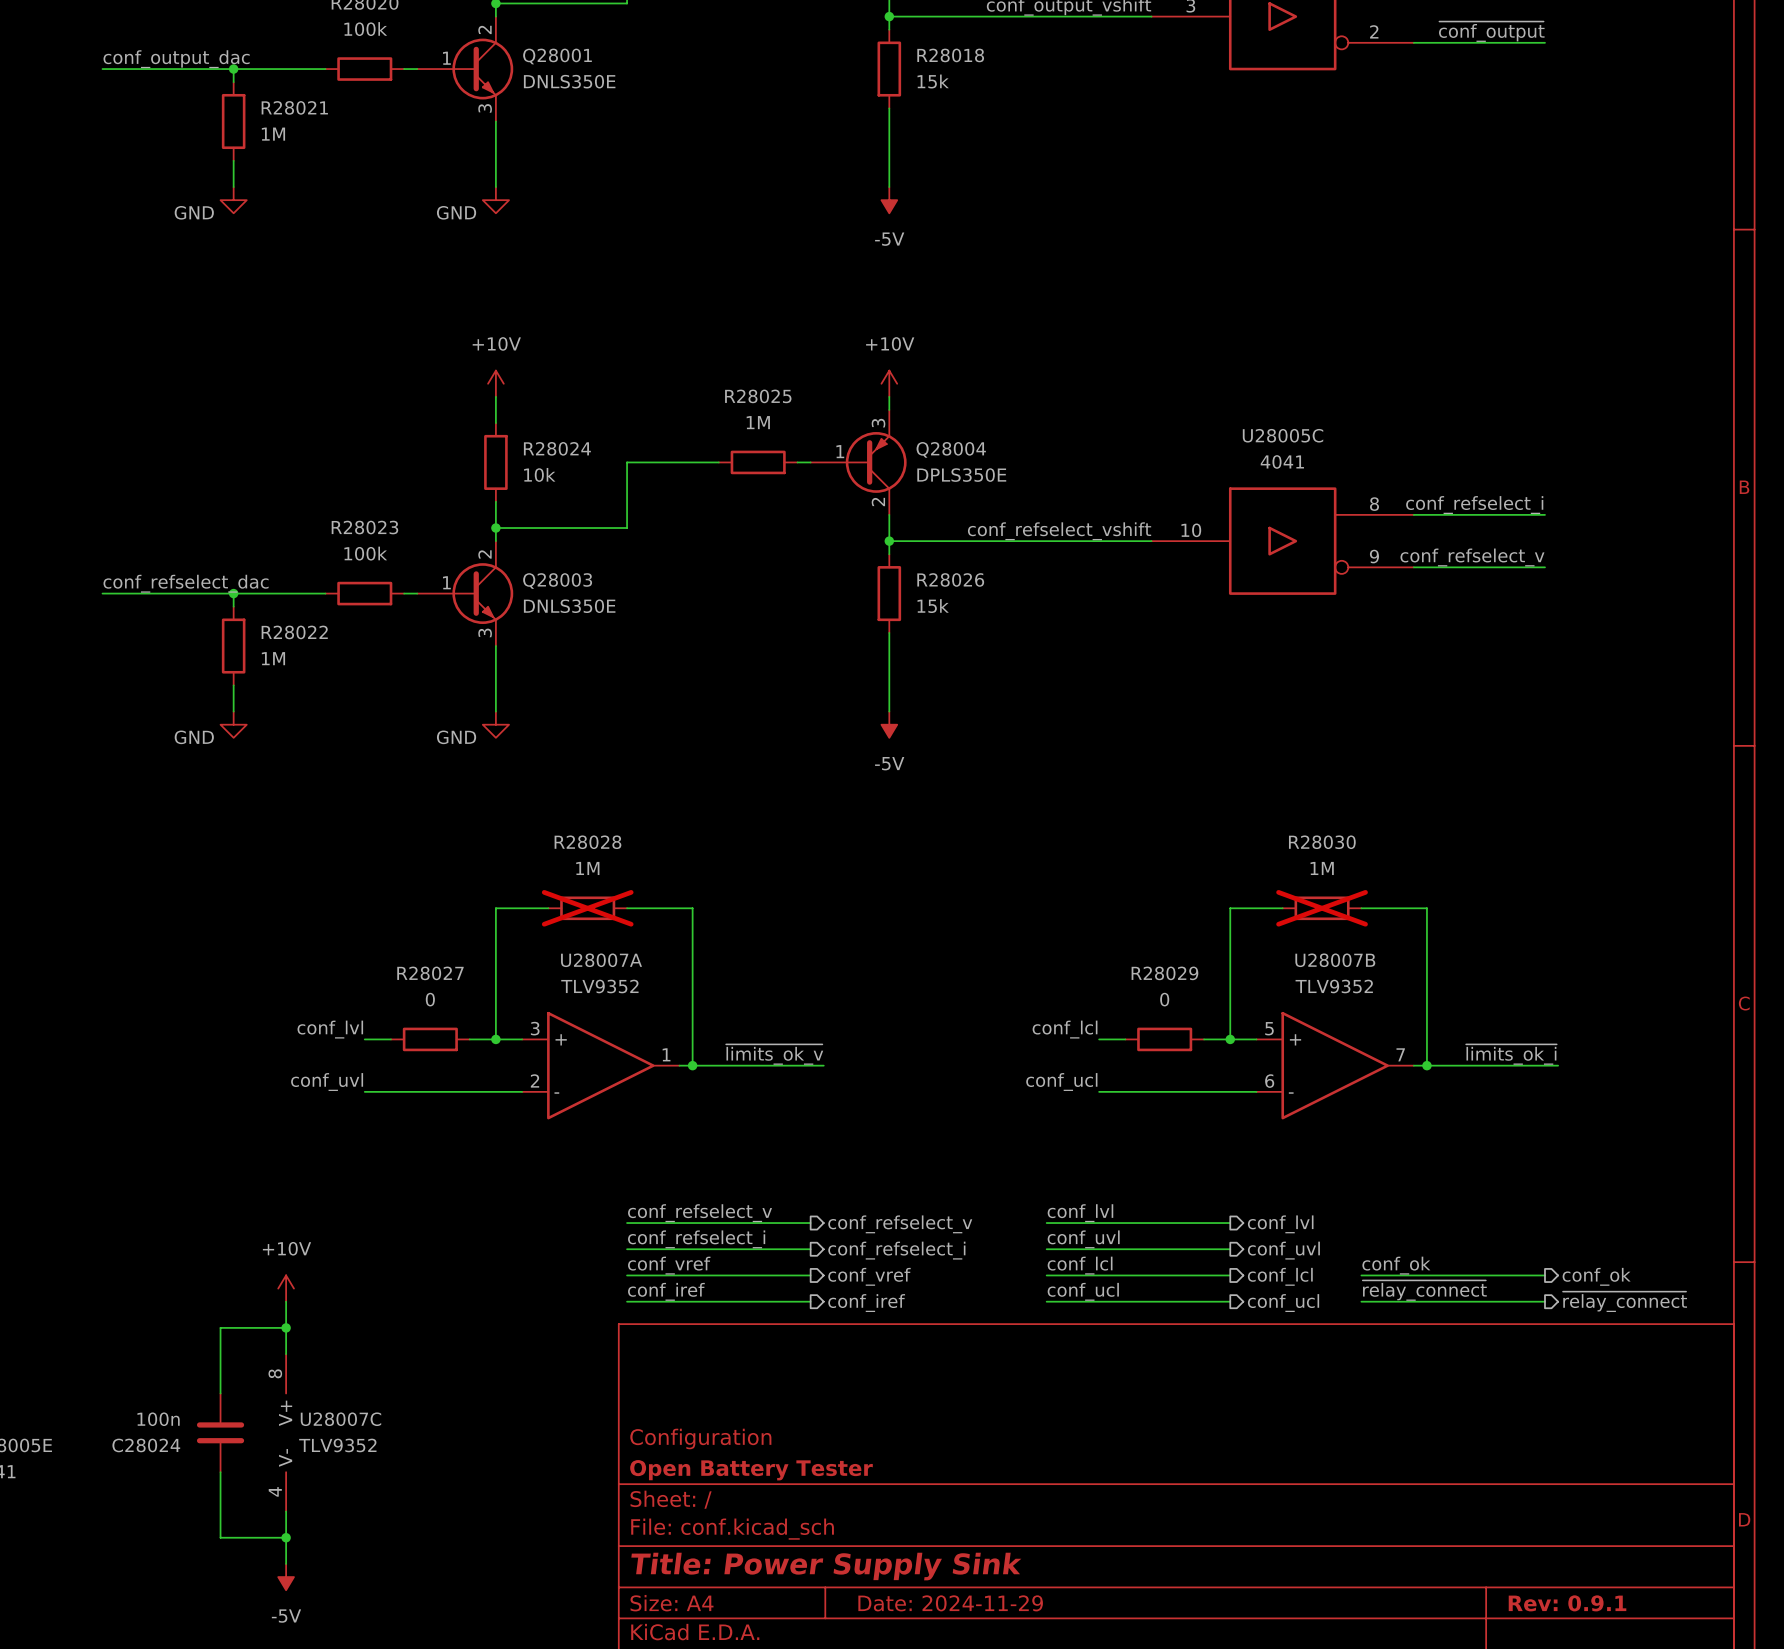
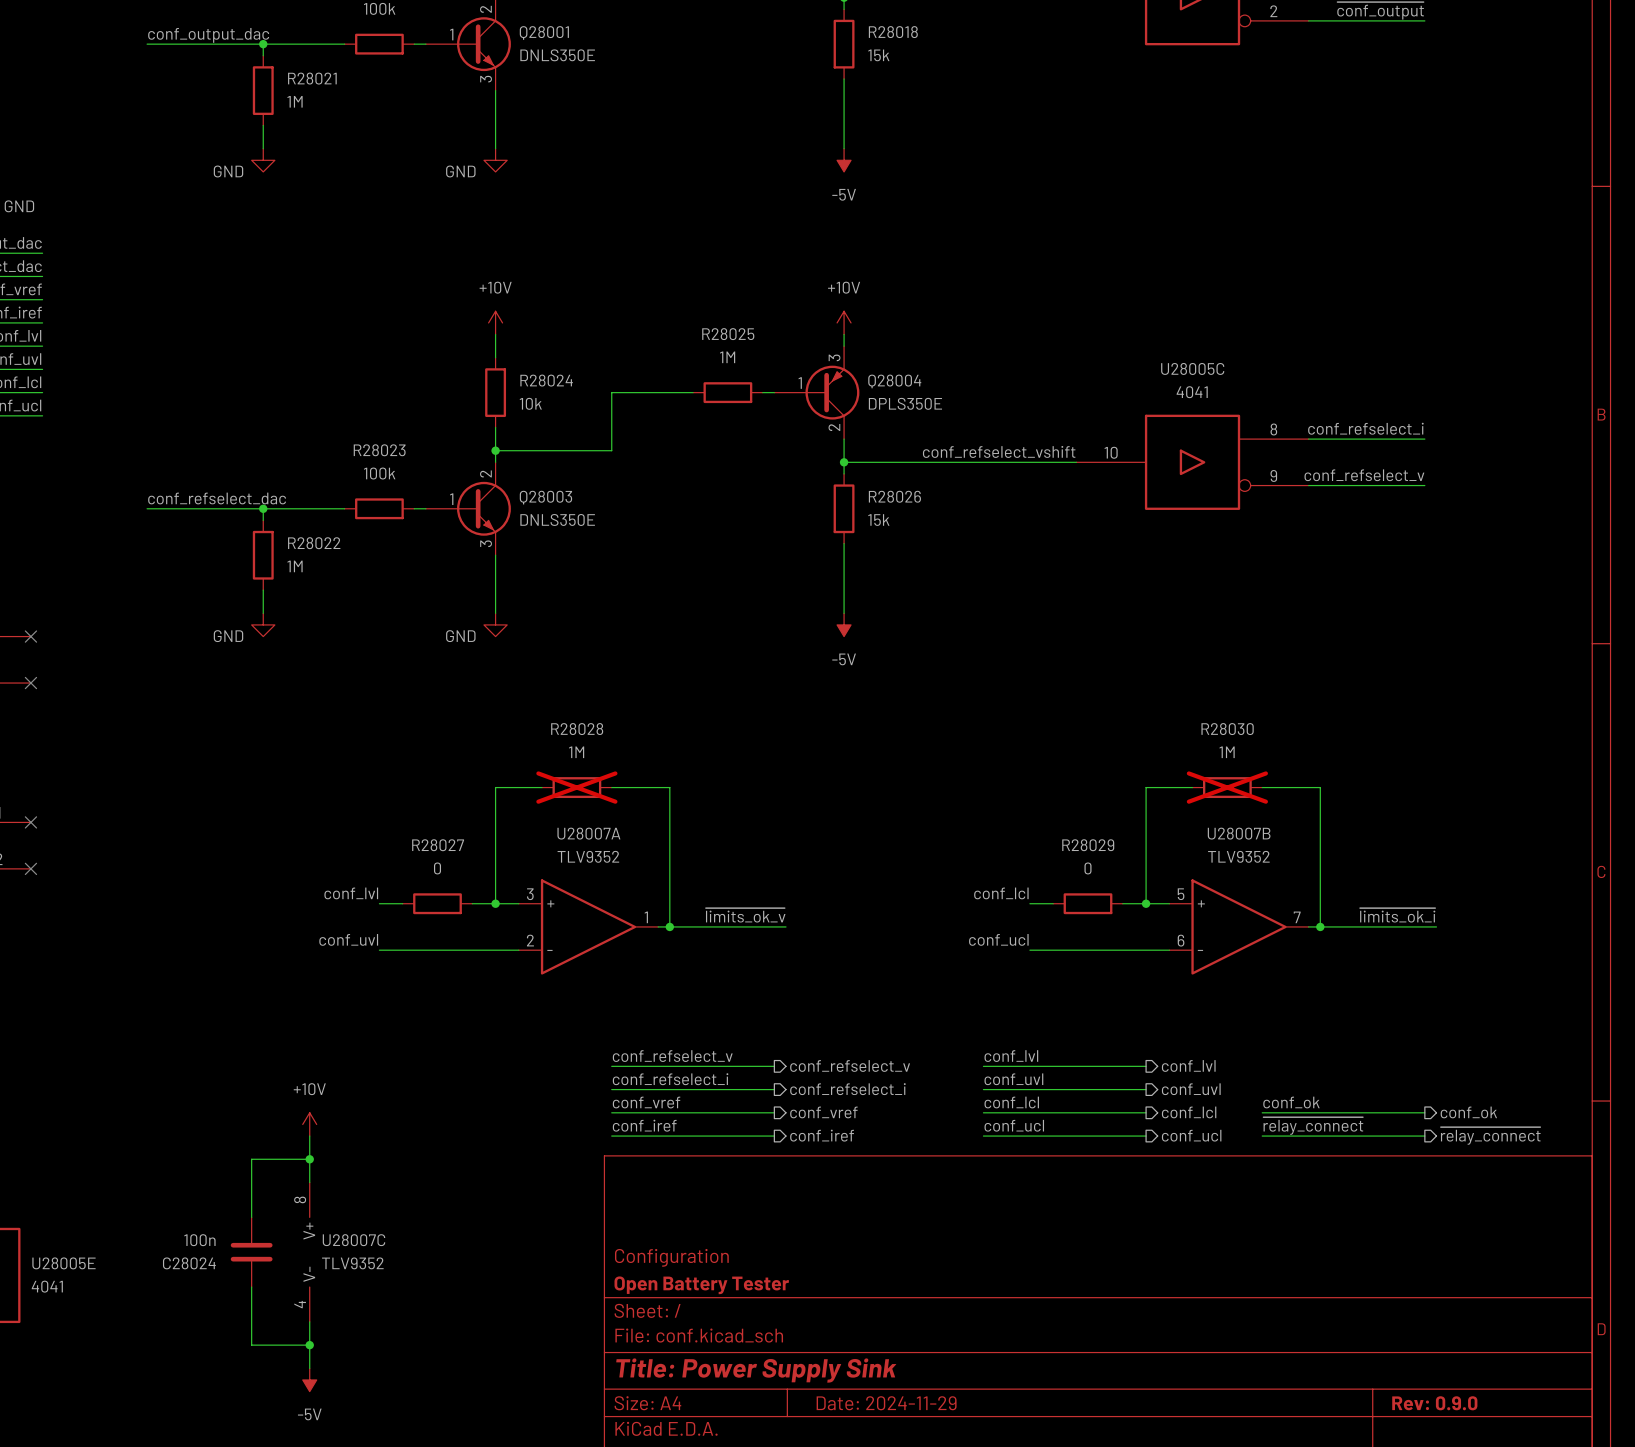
title block: Rev: 0.9.1 (1567, 1603) -> Rev: 0.9.0 (1434, 1403)

